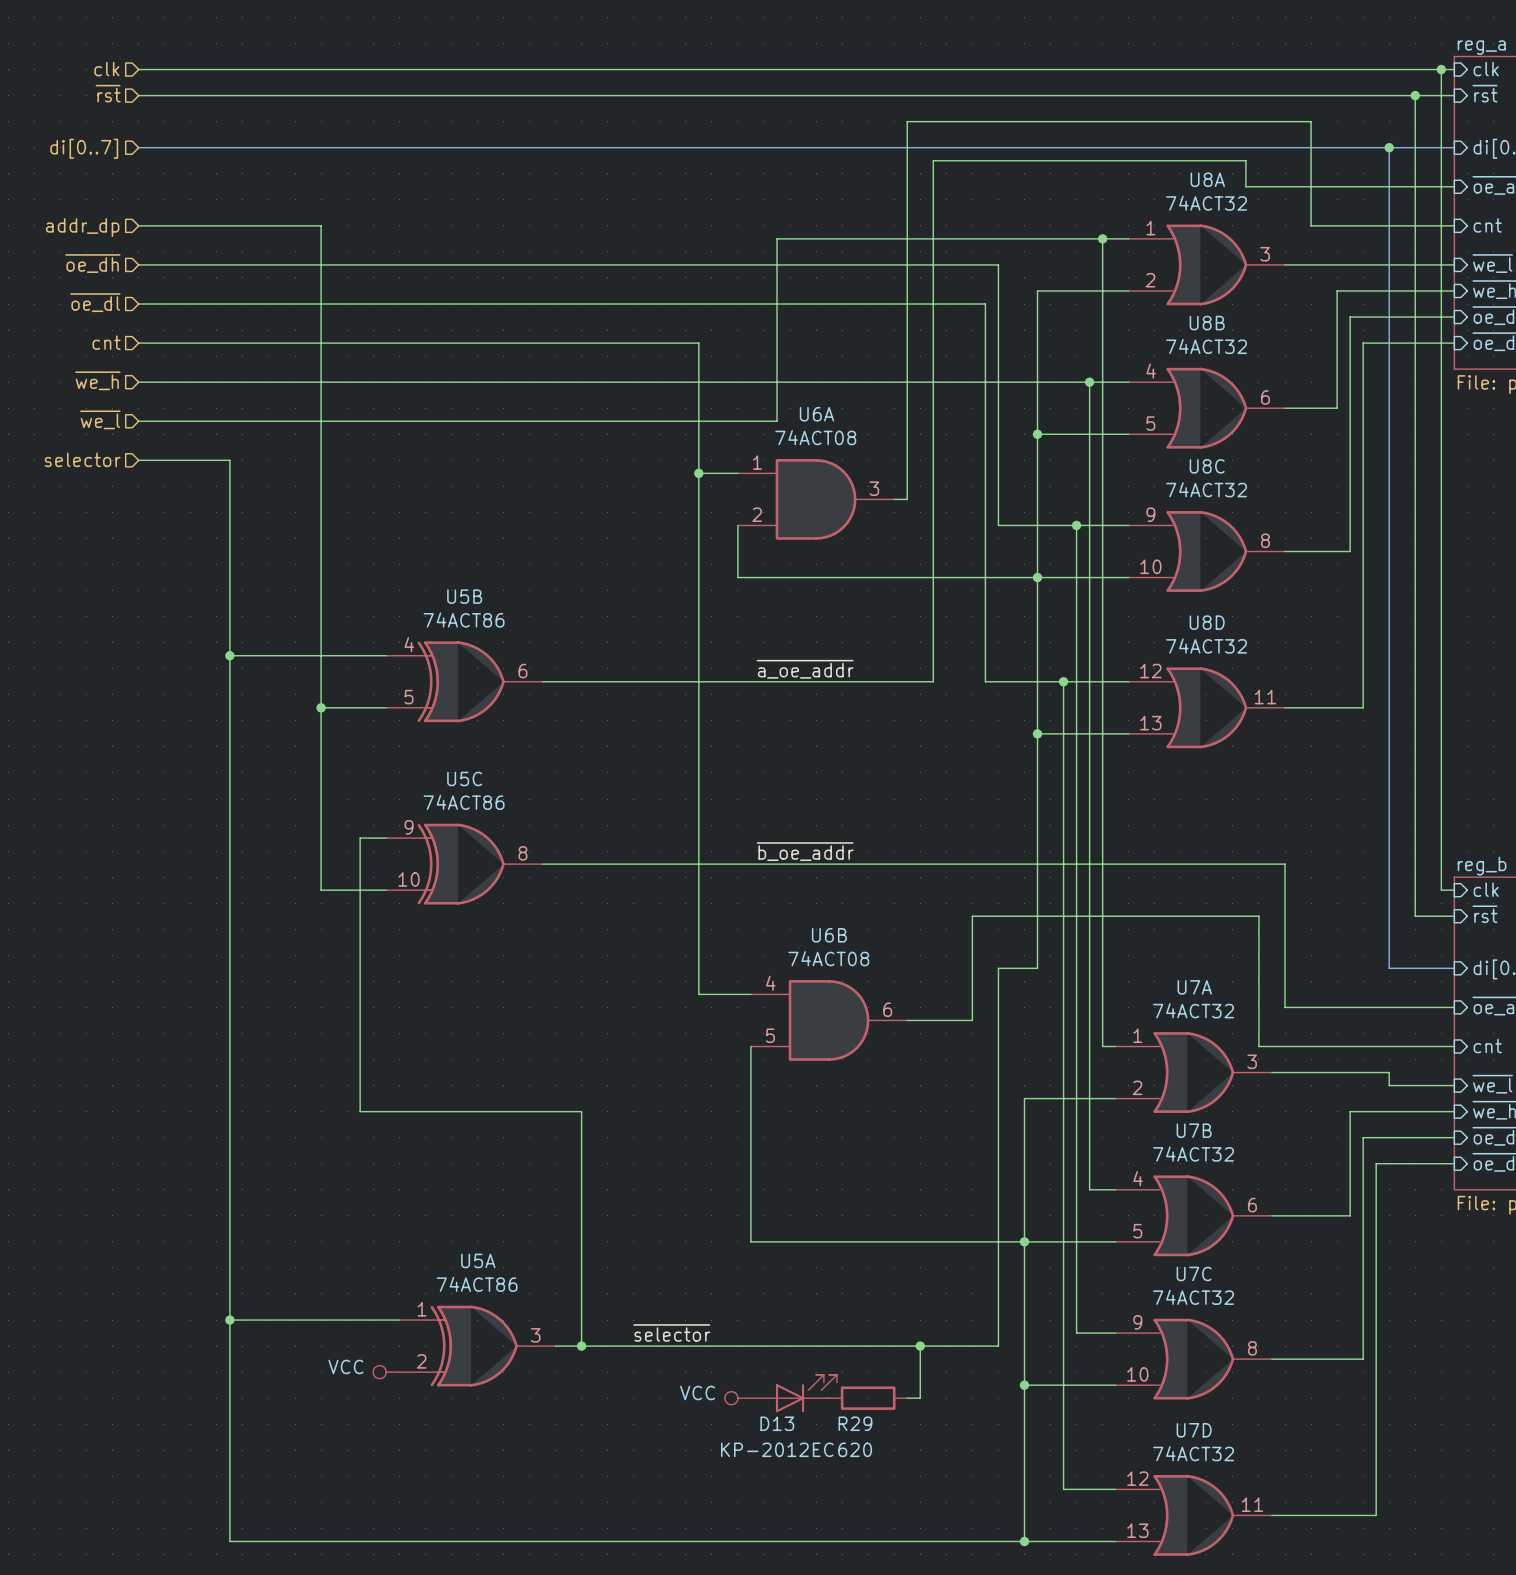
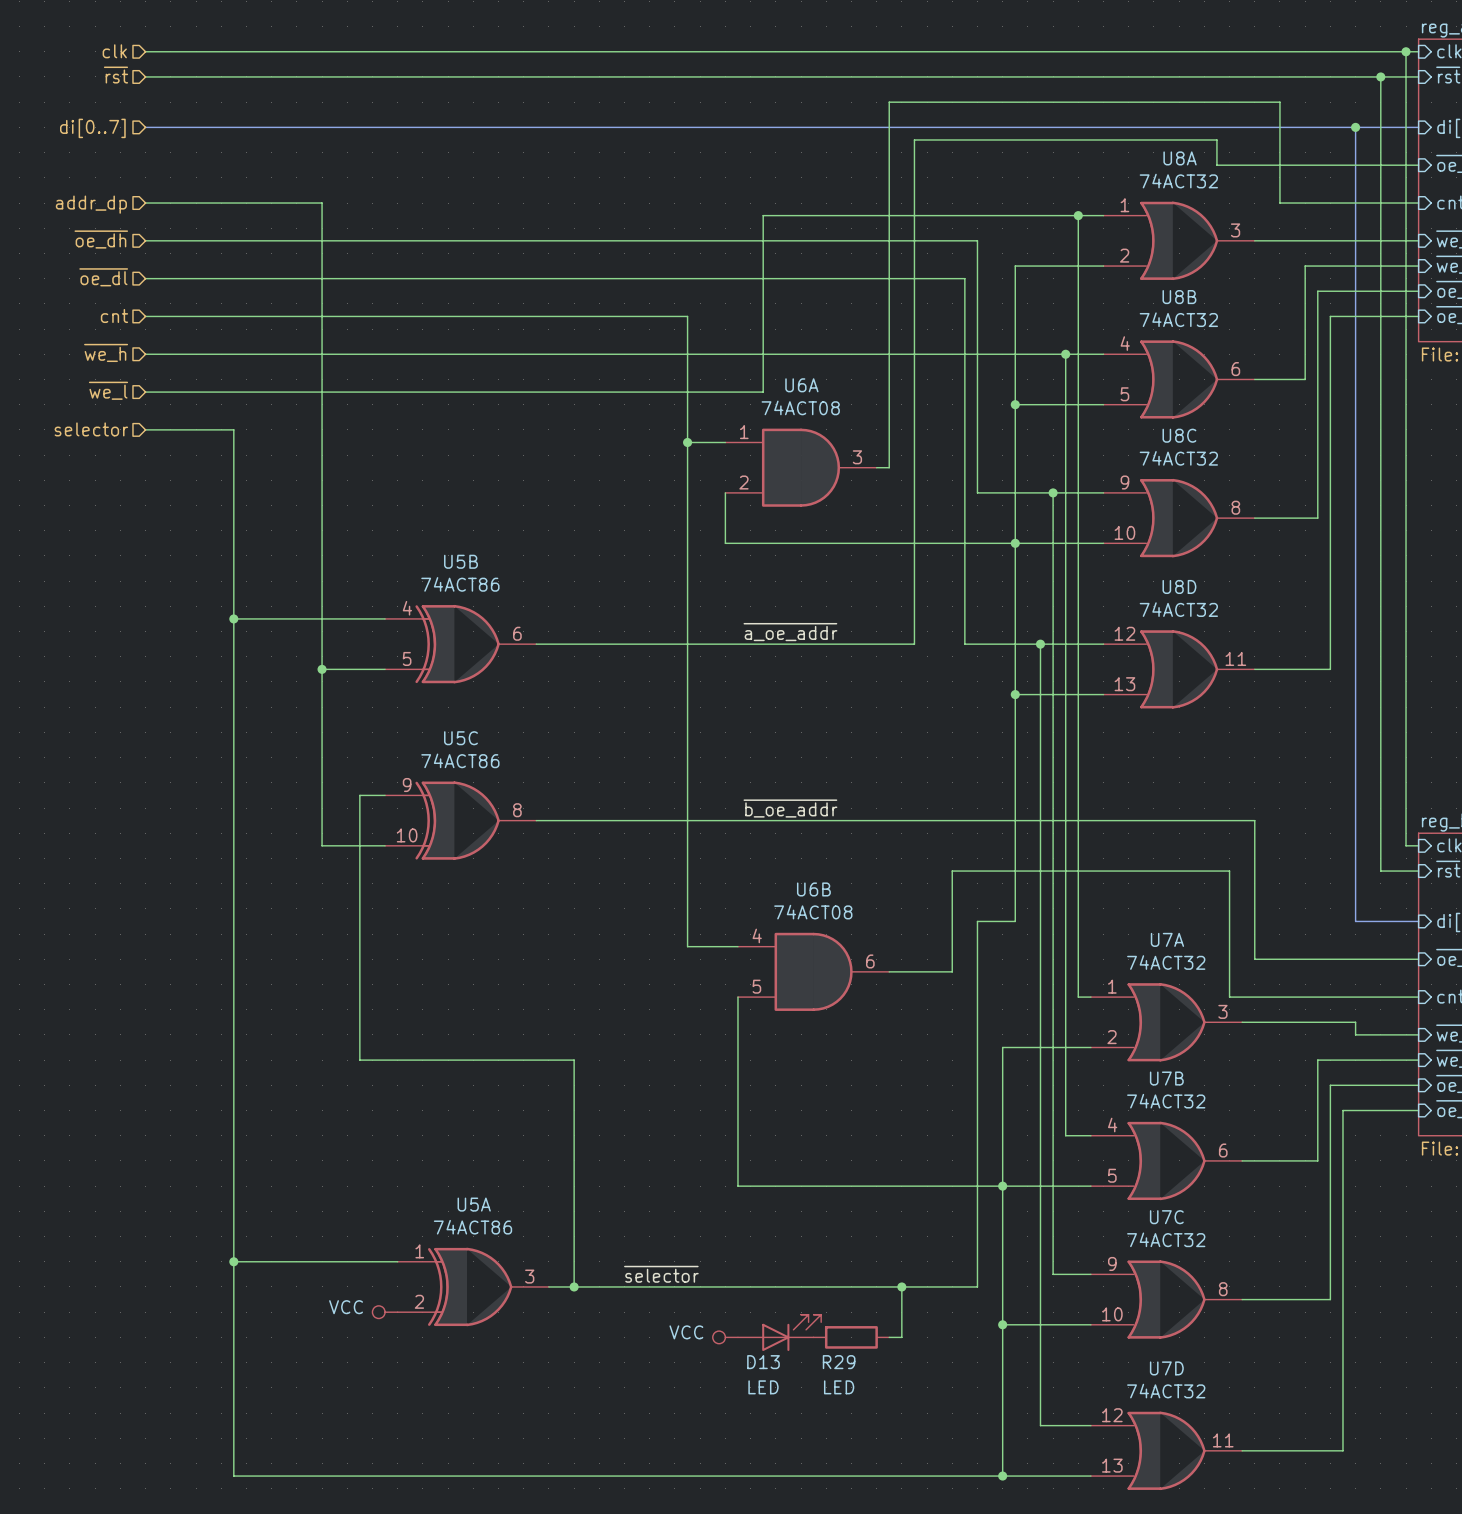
D13 value: KP-2012EC (777, 1449) -> LED (763, 1387)
R29 value: 620 (855, 1449) -> LED (839, 1387)

